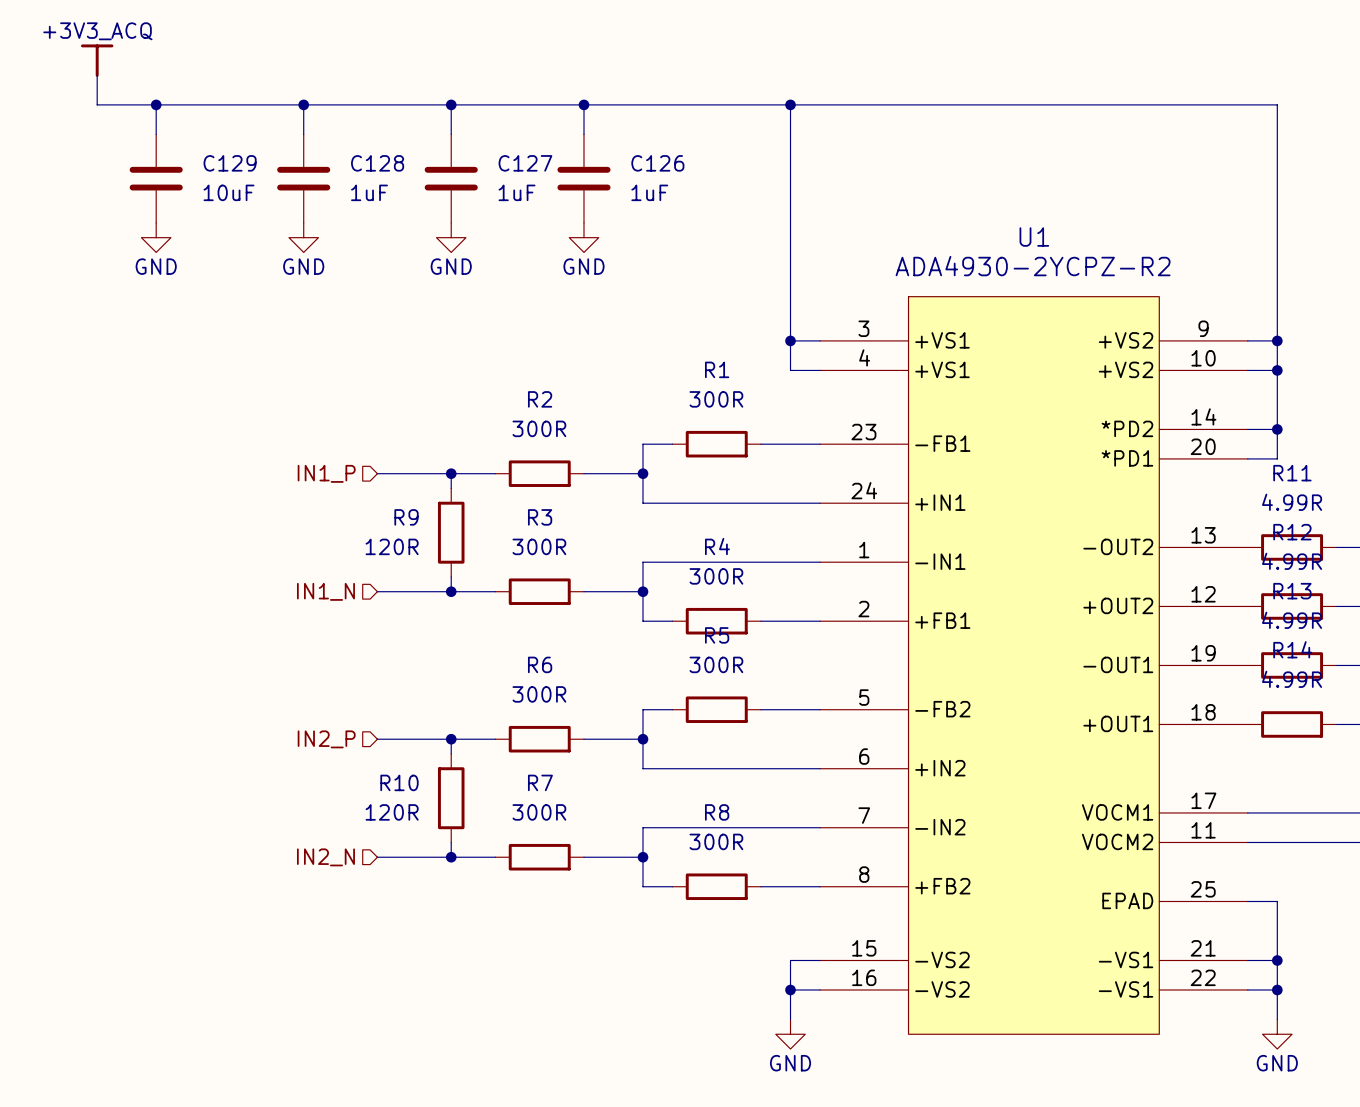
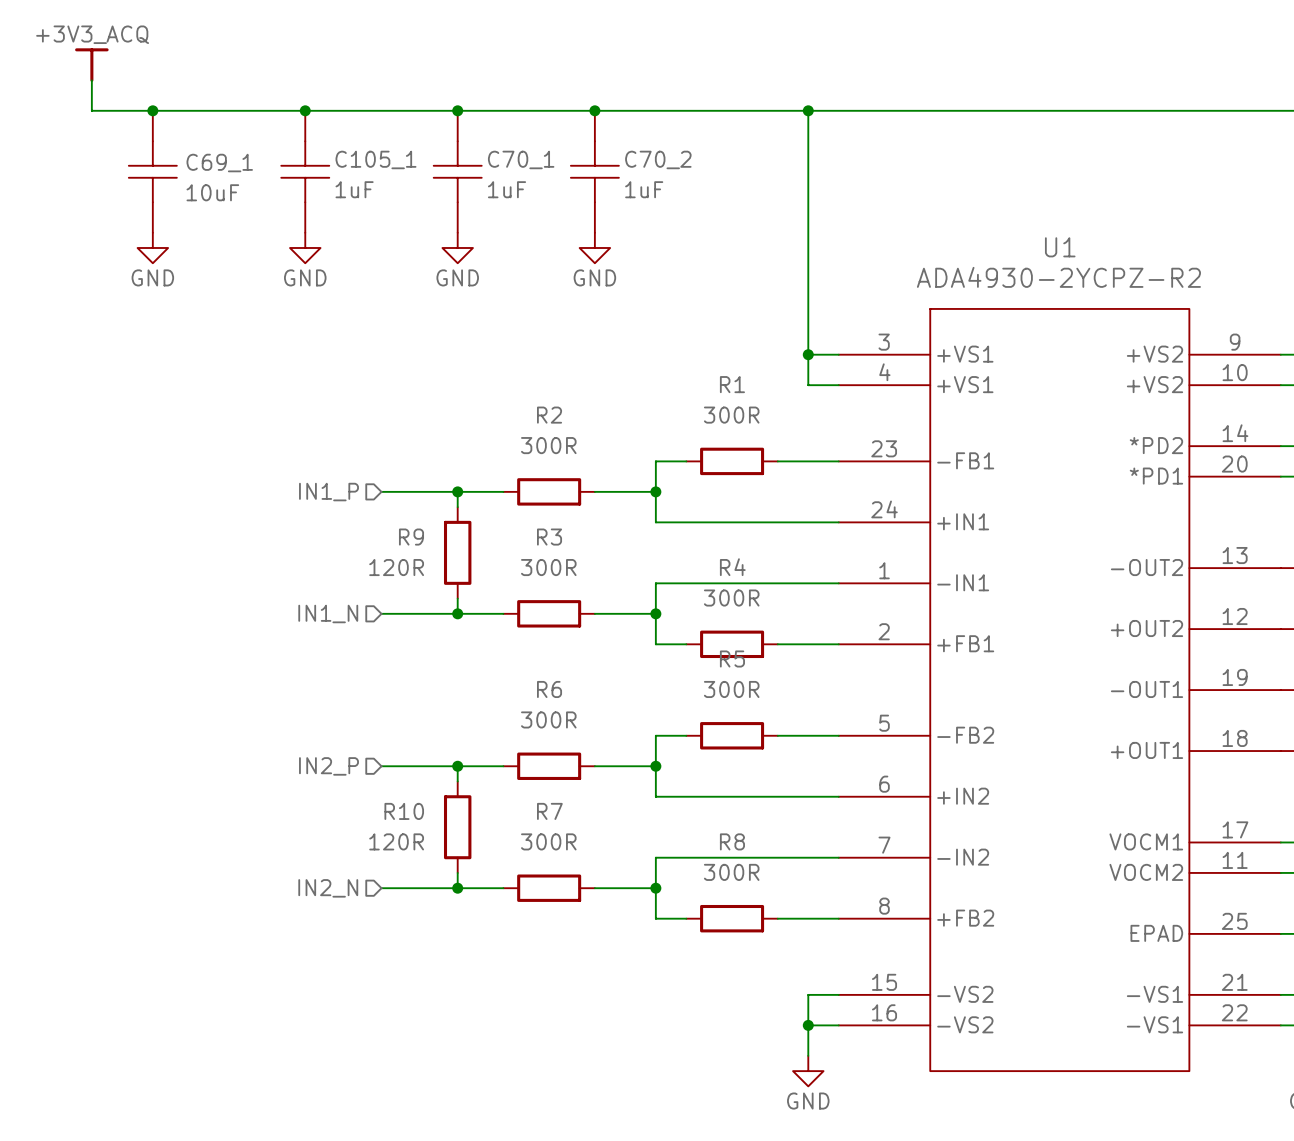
C69_1: none -> 10uF (152, 171)
C105_1: none -> 1uF (305, 171)
C70_1: none -> 1uF (457, 171)
C70_2: none -> 1uF (594, 171)
C129: 10uF (156, 178) -> none
C128: 1uF (303, 178) -> none
C127: 1uF (451, 178) -> none
C126: 1uF (583, 178) -> none

